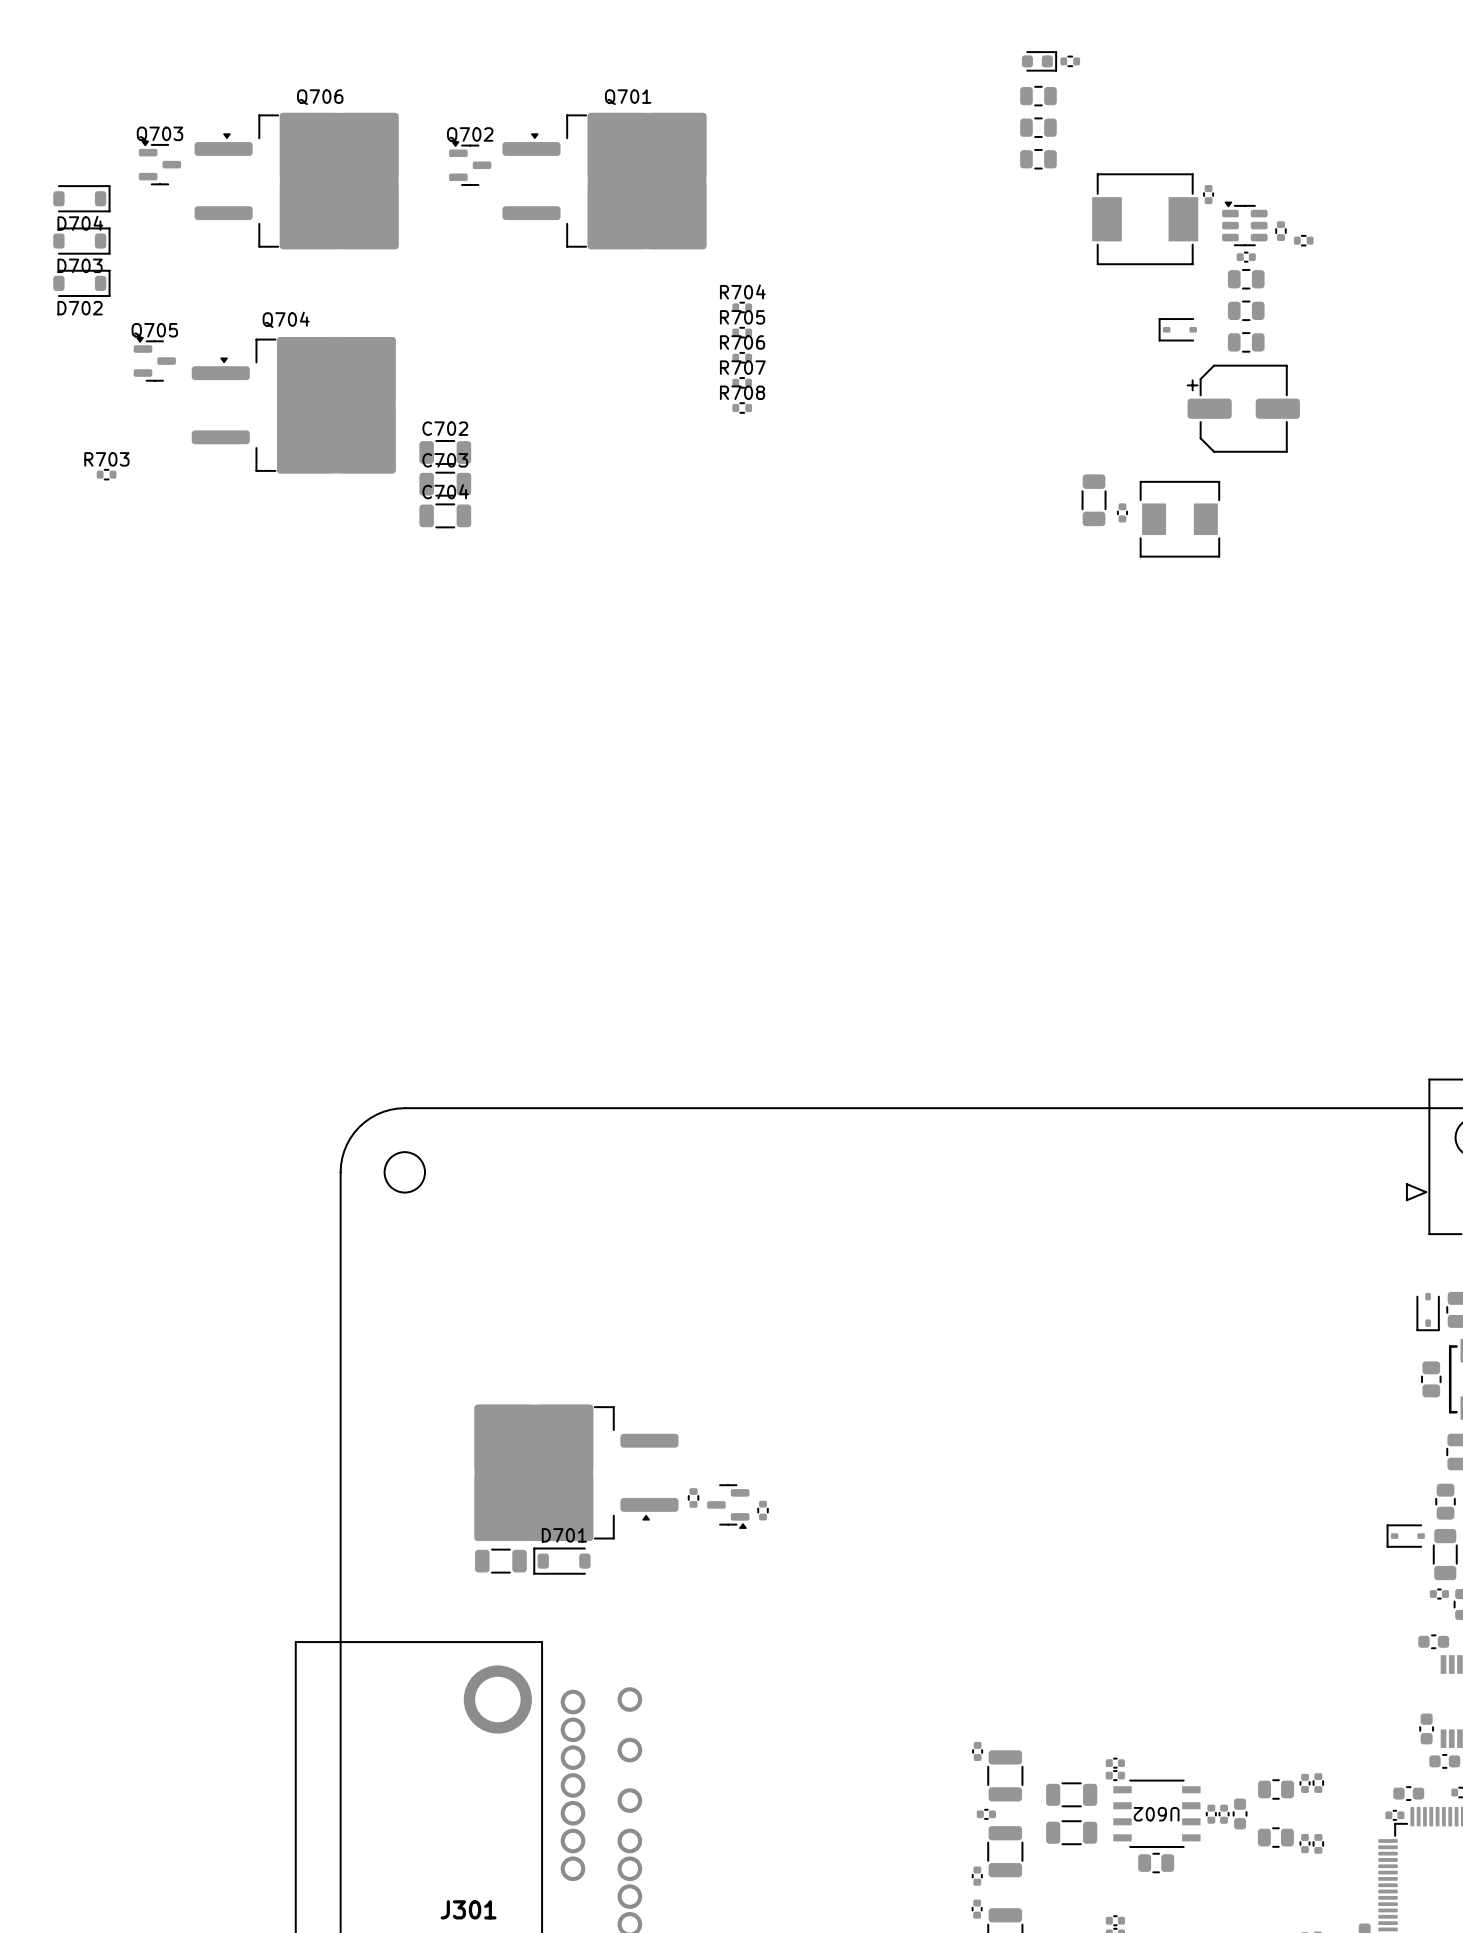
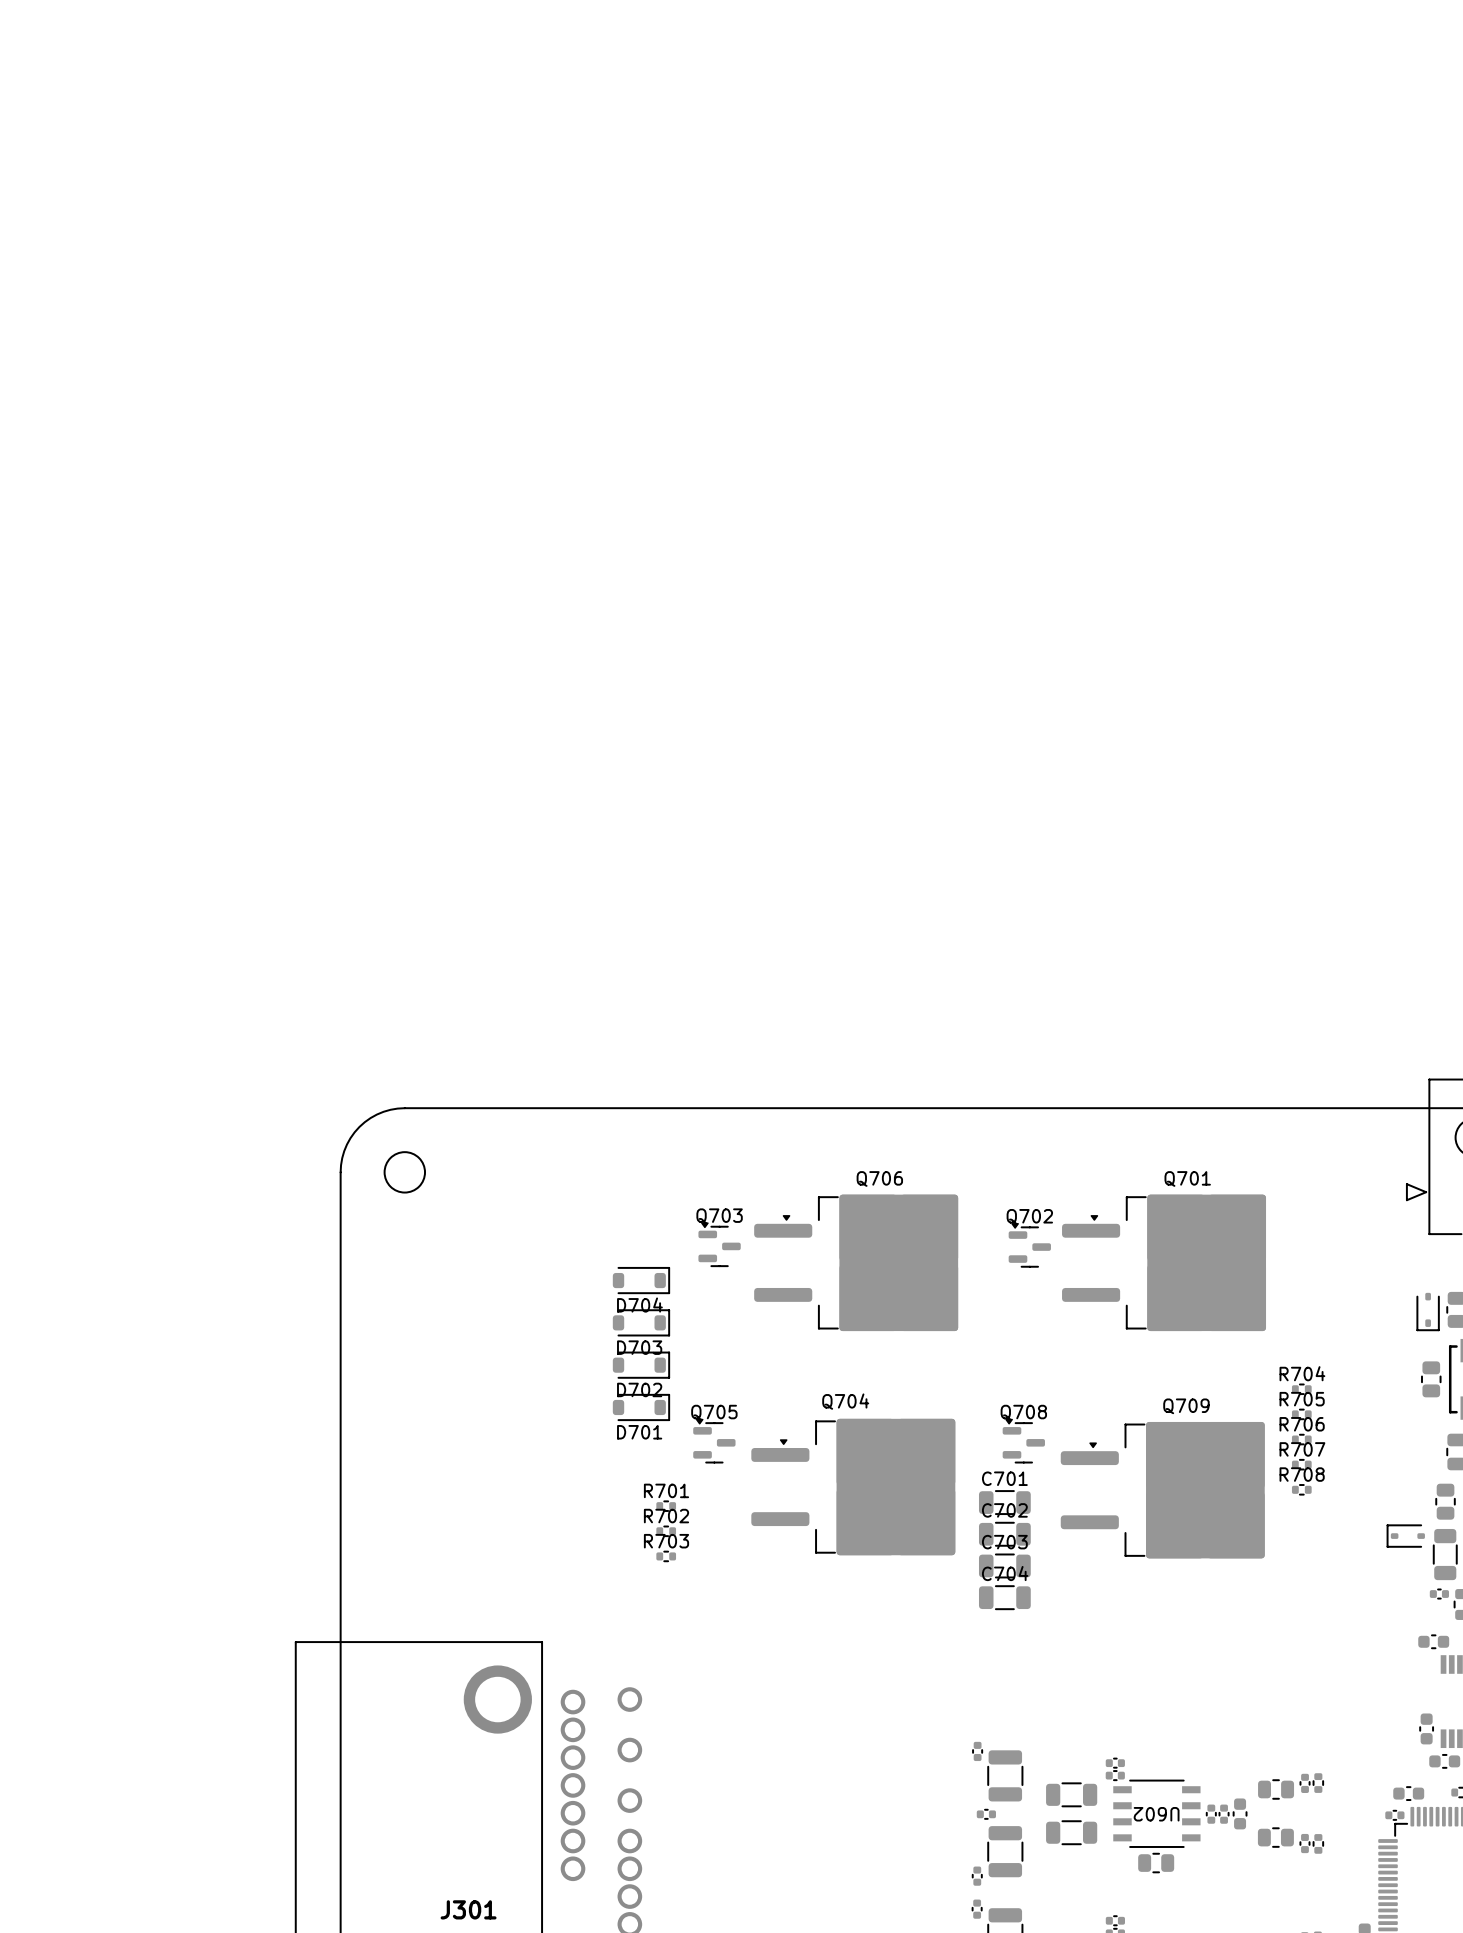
part: (1039, 61) -> none
part: (1070, 61) -> none
part: (1038, 96) -> none
part: (1038, 127) -> none
part: (1038, 159) -> none
Q703 position: (159, 162) -> (719, 1244)
Q702 position: (470, 163) -> (1029, 1245)
Q706 position: (296, 181) -> (856, 1262)
Q701 position: (604, 181) -> (1164, 1262)
part: (1208, 194) -> none
D704 position: (81, 198) -> (641, 1280)
part: (1145, 219) -> none
part: (1244, 223) -> none
part: (1280, 231) -> none
part: (1303, 240) -> none
D703 position: (81, 241) -> (641, 1322)
part: (1246, 257) -> none
part: (1246, 279) -> none
D702 position: (81, 283) -> (641, 1365)
R704 position: (742, 307) -> (1301, 1389)
part: (1246, 310) -> none
part: (1177, 329) -> none
R705 position: (742, 332) -> (1301, 1414)
part: (1246, 342) -> none
R706 position: (742, 357) -> (1301, 1439)
Q705 position: (154, 359) -> (714, 1441)
R707 position: (742, 382) -> (1301, 1464)
Q704 position: (293, 405) -> (853, 1487)
R708 position: (742, 408) -> (1301, 1489)
part: (1243, 408) -> none
C702 position: (445, 452) -> (1004, 1534)
R703 position: (106, 474) -> (666, 1556)
C703 position: (445, 484) -> (1004, 1565)
part: (1094, 500) -> none
part: (1122, 512) -> none
C704 position: (445, 515) -> (1004, 1597)
part: (1179, 519) -> none
Q708: none -> (1023, 1441)
part: (576, 1472) -> none
Q709: none -> (1162, 1490)
part: (693, 1497) -> none
C701: none -> (1004, 1502)
R701: none -> (666, 1506)
part: (728, 1506) -> none
part: (763, 1510) -> none
R702: none -> (666, 1531)
part: (500, 1561) -> none
D701 rotation: 0° (562, 1561) -> 180° (641, 1407)
D701 position: (562, 1561) -> (641, 1407)

